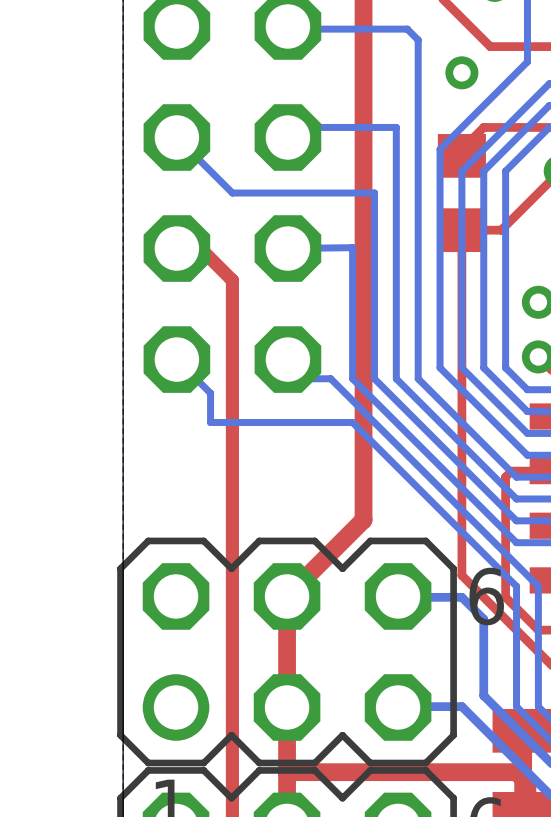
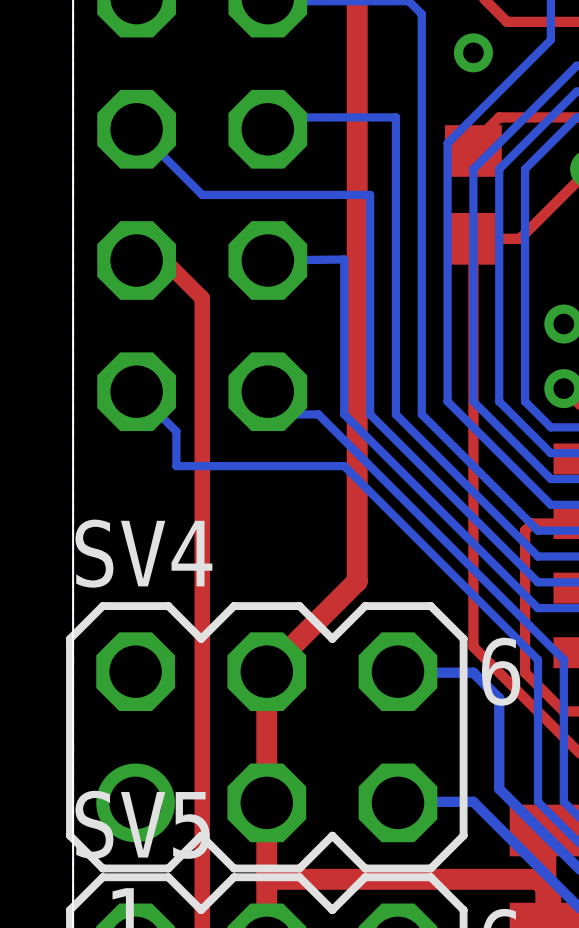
SV4 name: none -> SV4 (143, 553)
SV5 name: none -> SV5 (142, 824)

